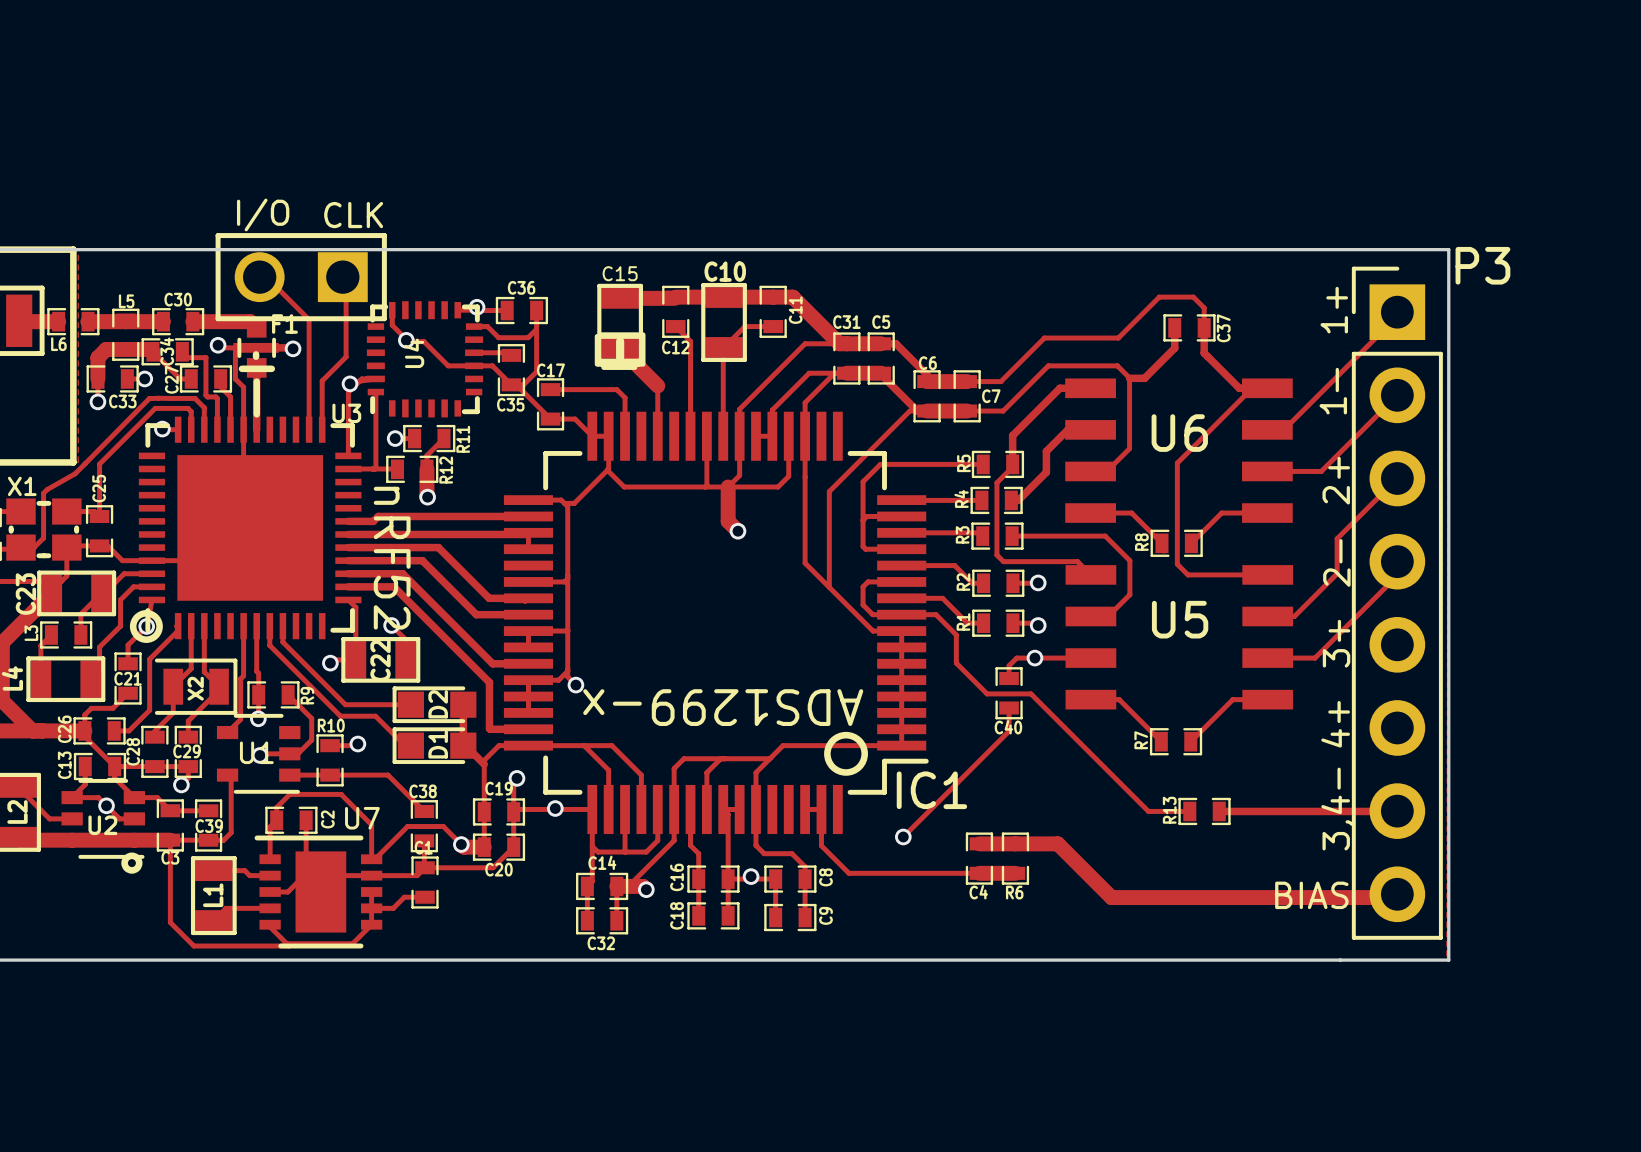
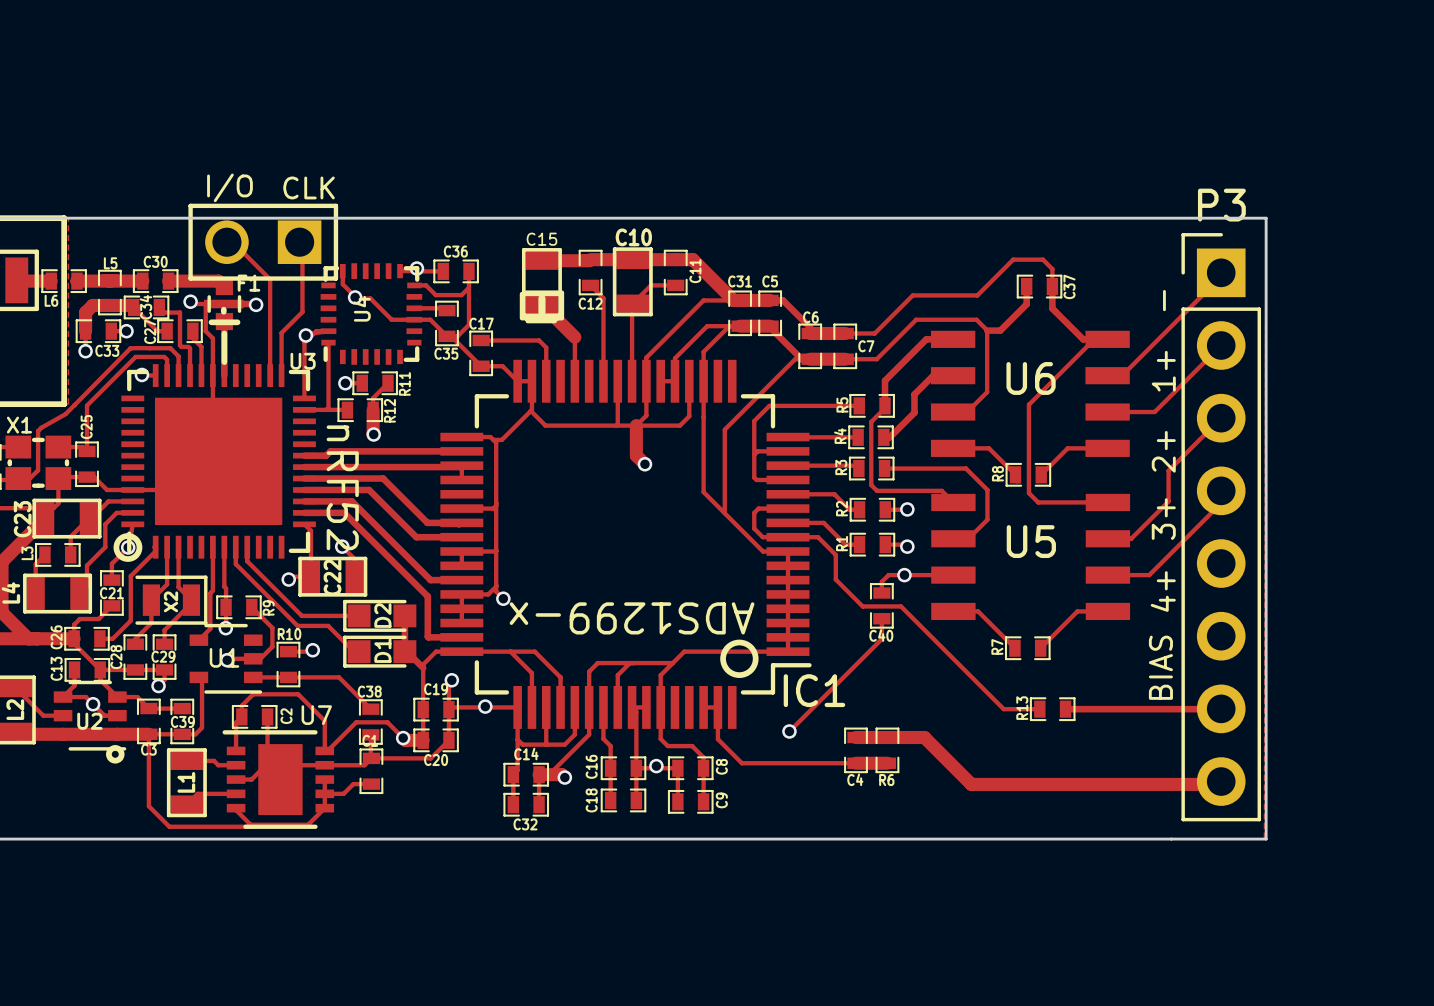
P3 name position: P3 (1482, 265) -> P3 (1221, 205)
text position: 1+ (1334, 310) -> 1+ (1163, 371)
text: 1— (1333, 391) -> — (1164, 300)
text position: 2+ (1336, 480) -> 2+ (1163, 451)
text: 2— (1336, 562) -> none
text position: 3+ (1336, 643) -> 3+ (1163, 519)
text position: 4+ (1335, 724) -> 4+ (1163, 591)
text: 3,4- (1337, 809) -> none
text rotation: 0° (1311, 895) -> 90° counterclockwise (1160, 667)
text position: BIAS (1311, 895) -> BIAS (1160, 667)

